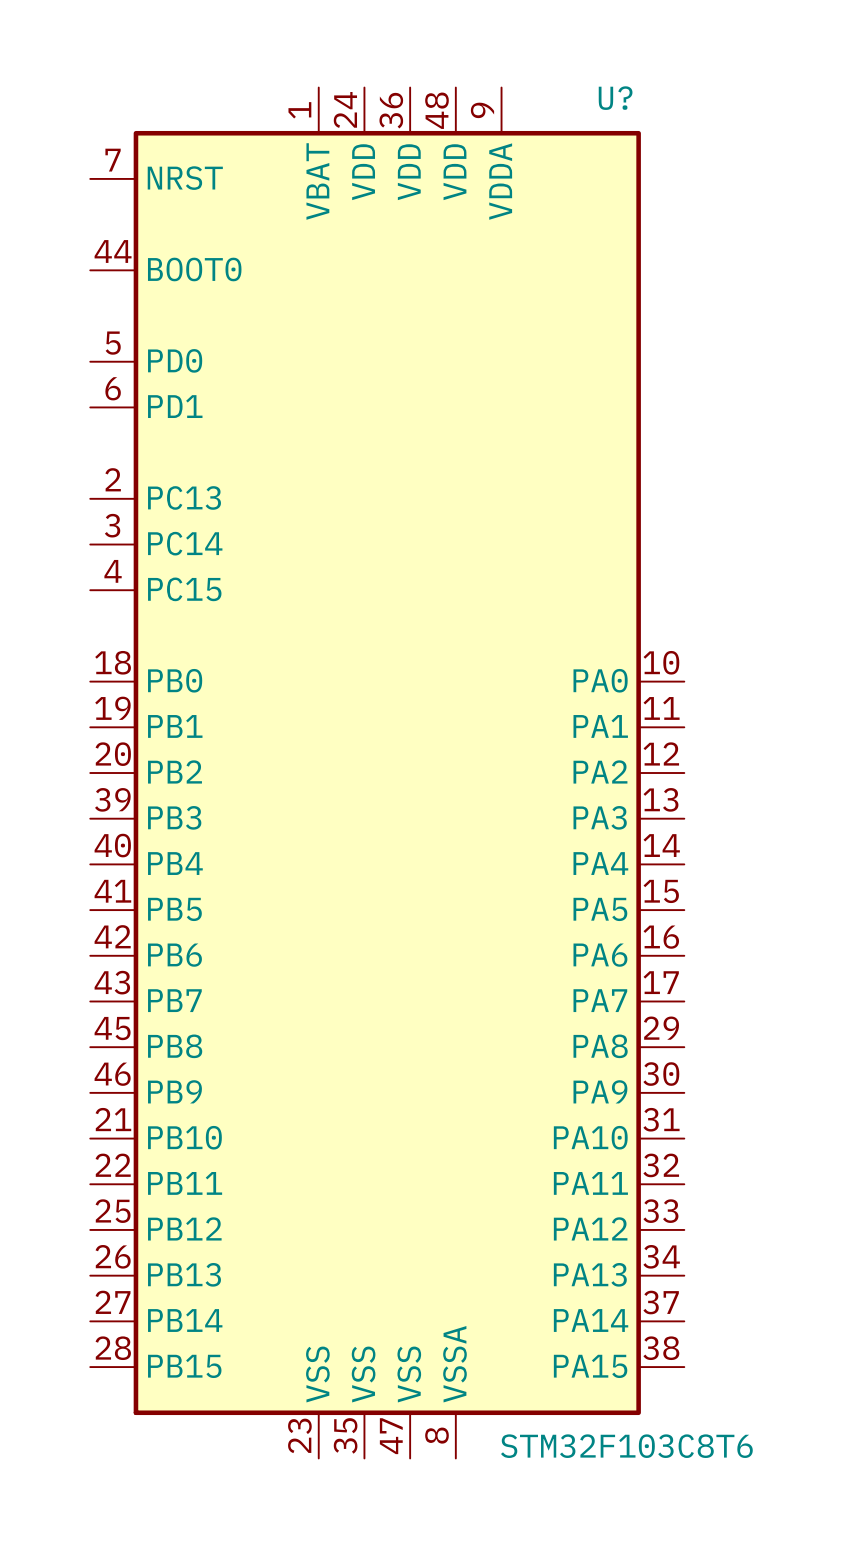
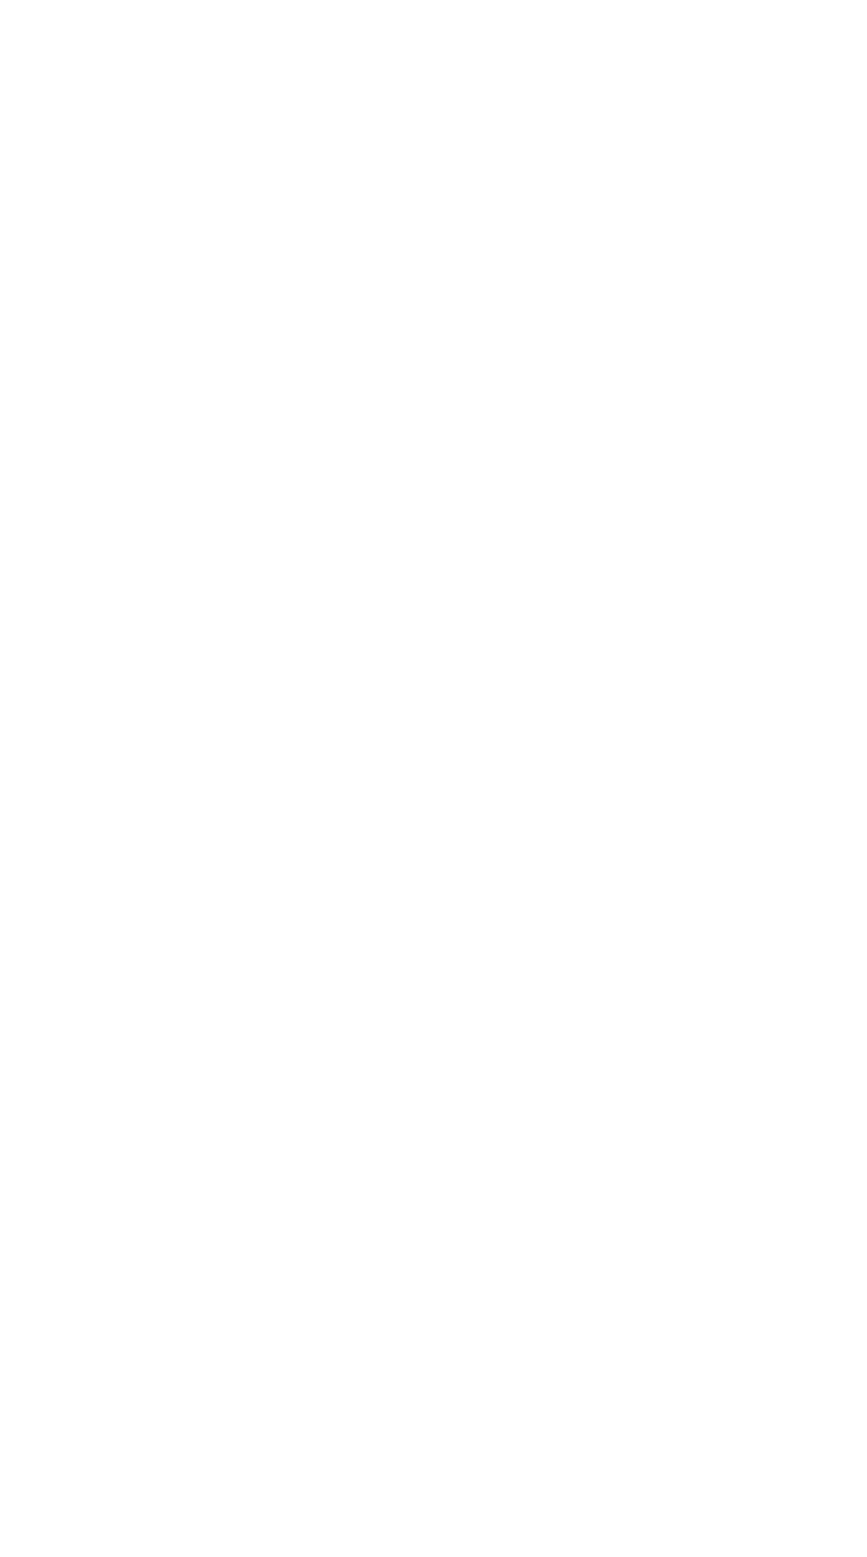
U?: STM32F103C8T6 (387, 773) -> none

